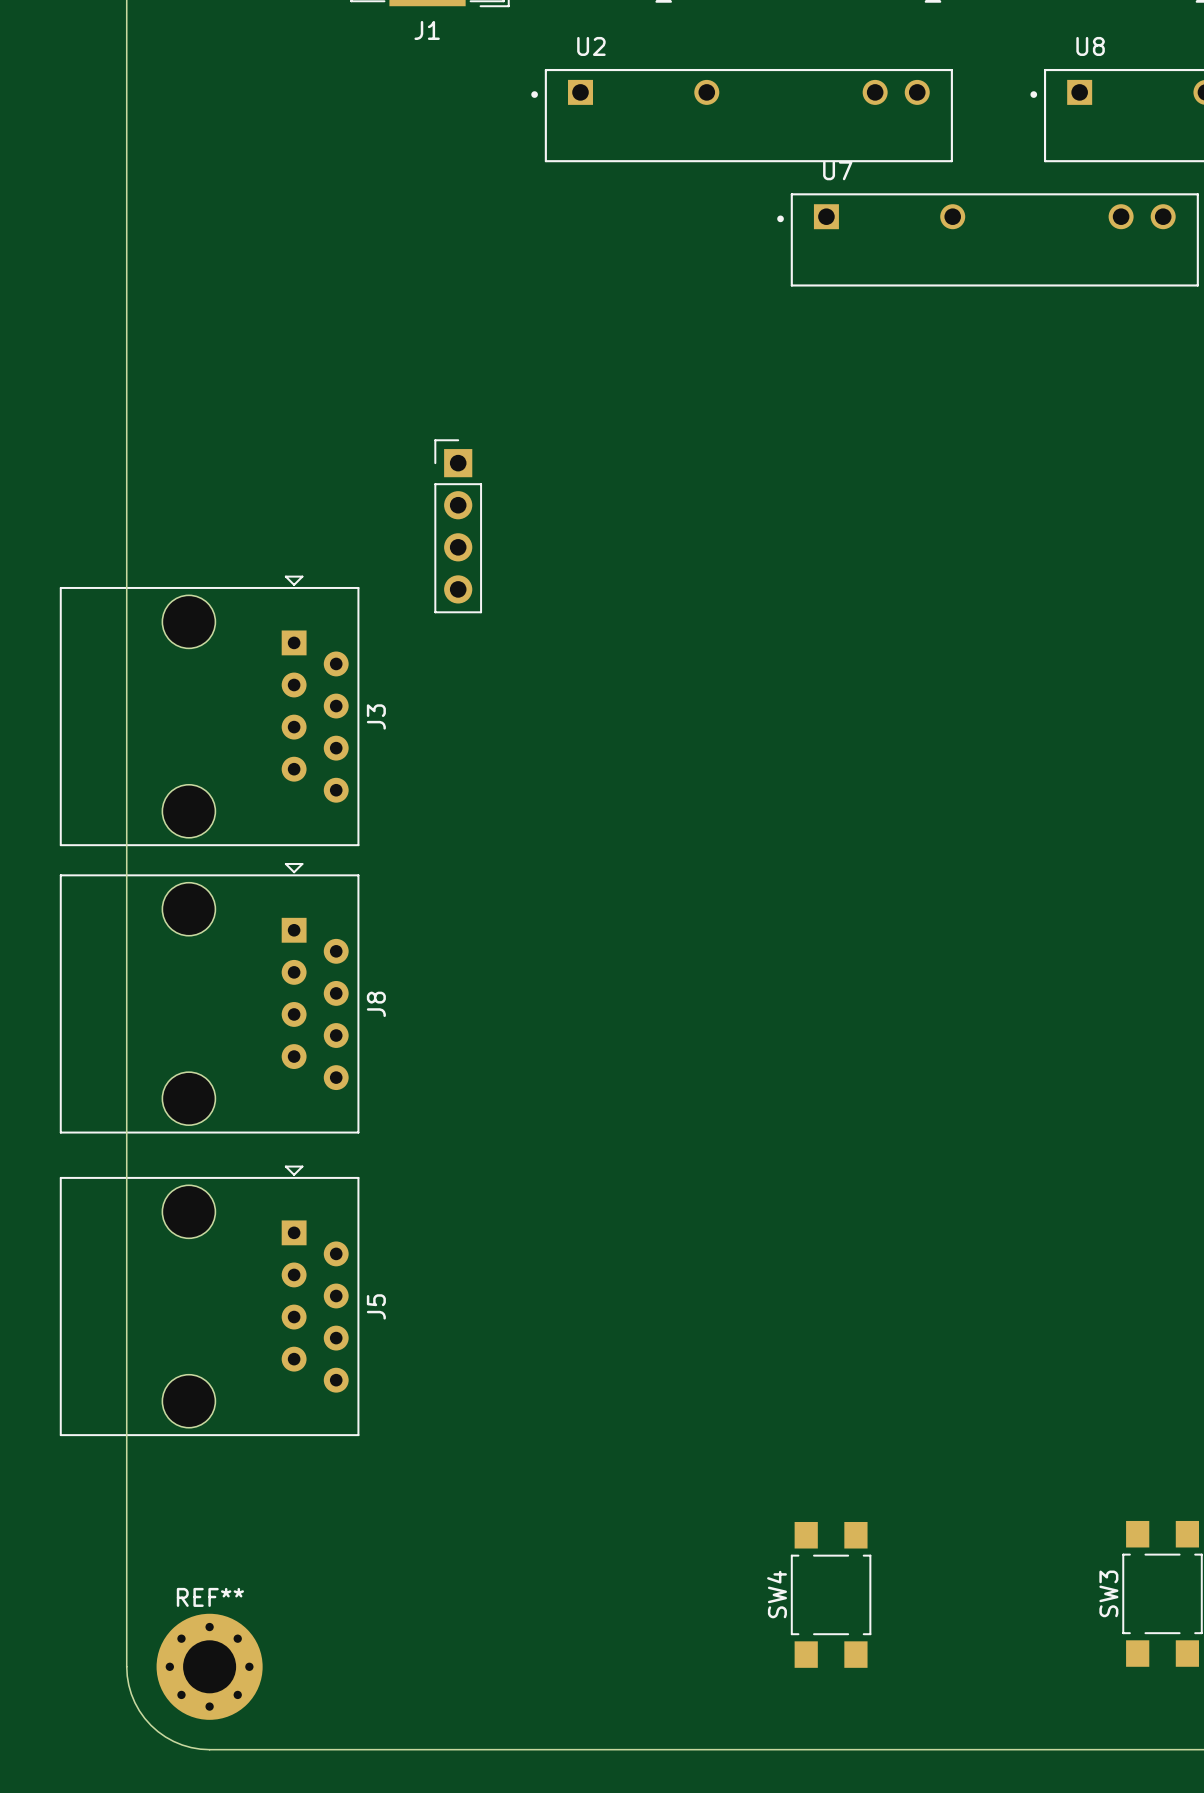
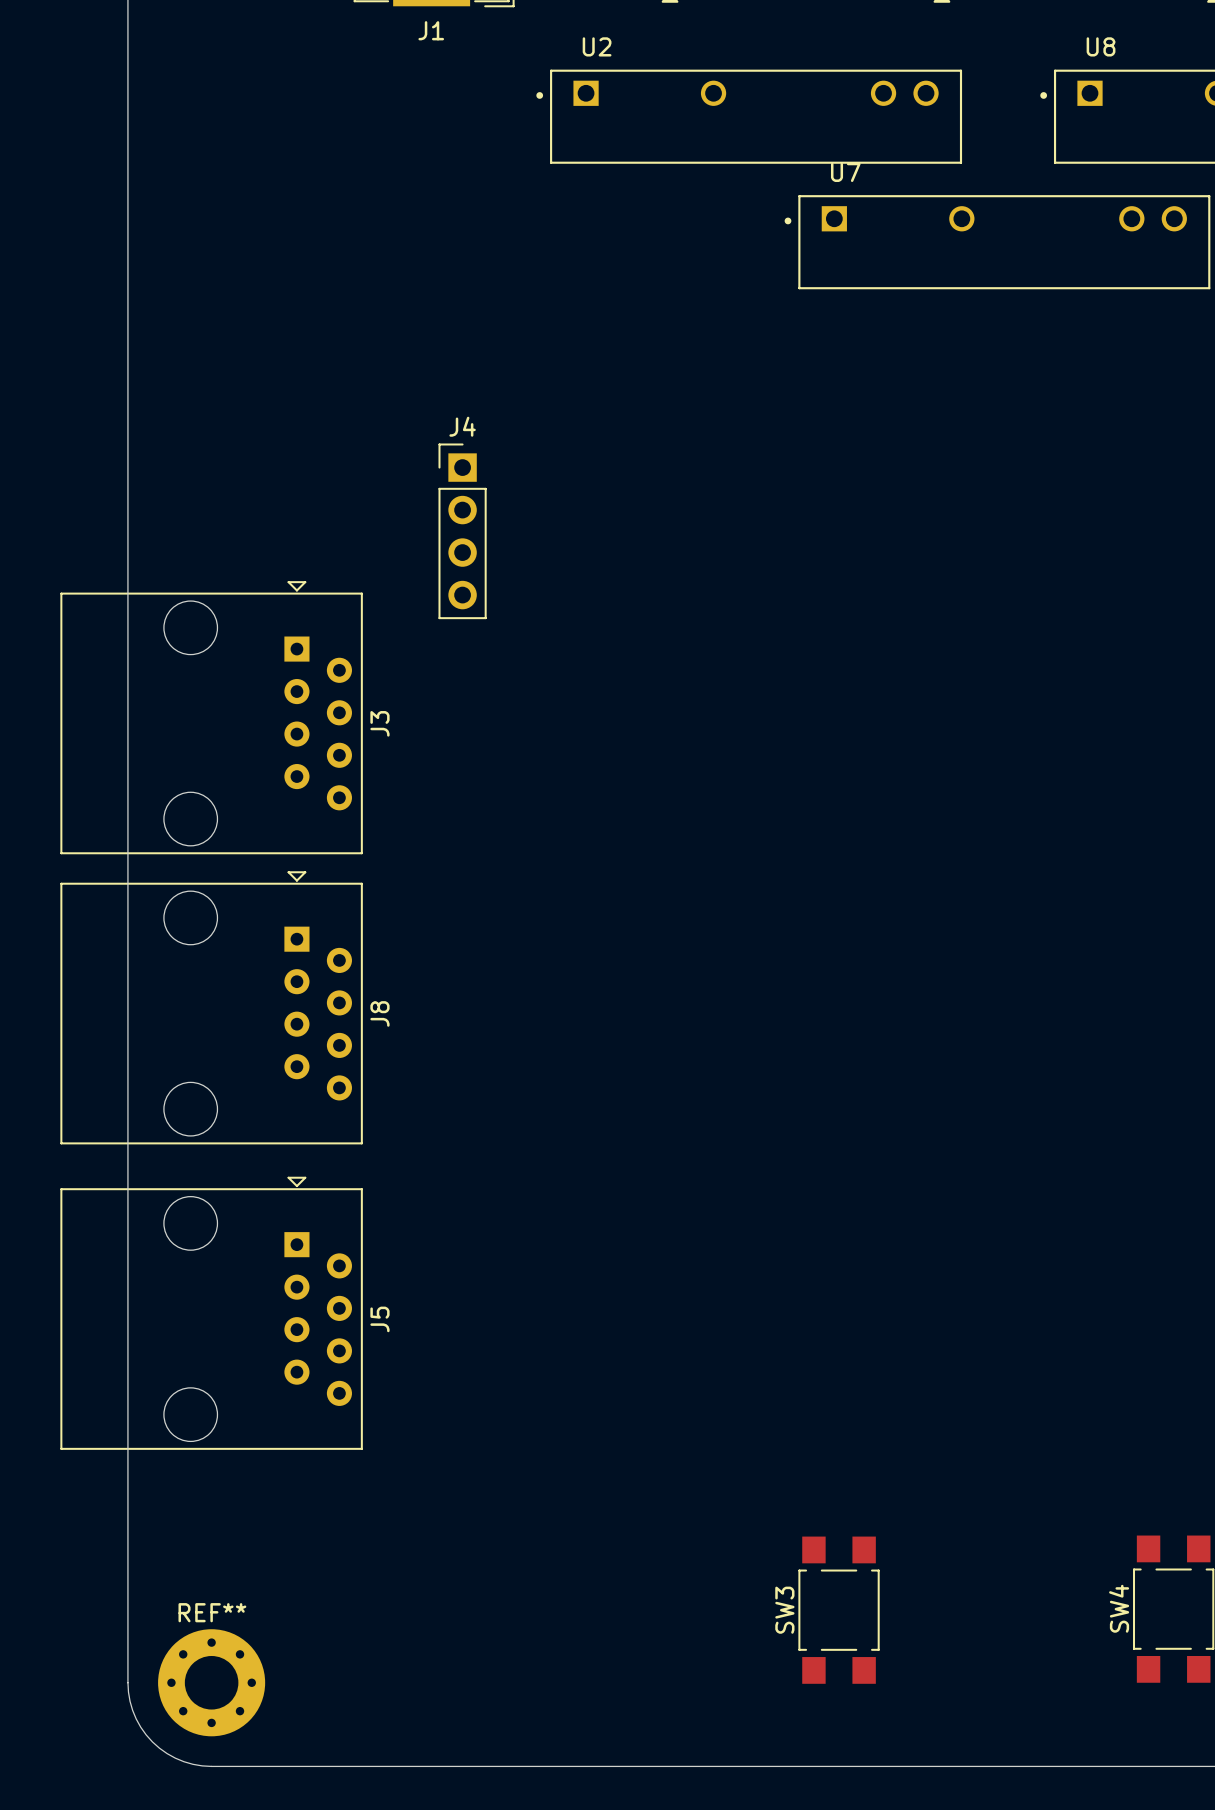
J4 name: none -> J4 (462, 426)
SW3 name: SW3 (1108, 1593) -> SW4 (1119, 1608)
SW4 name: SW4 (777, 1594) -> SW3 (784, 1610)

